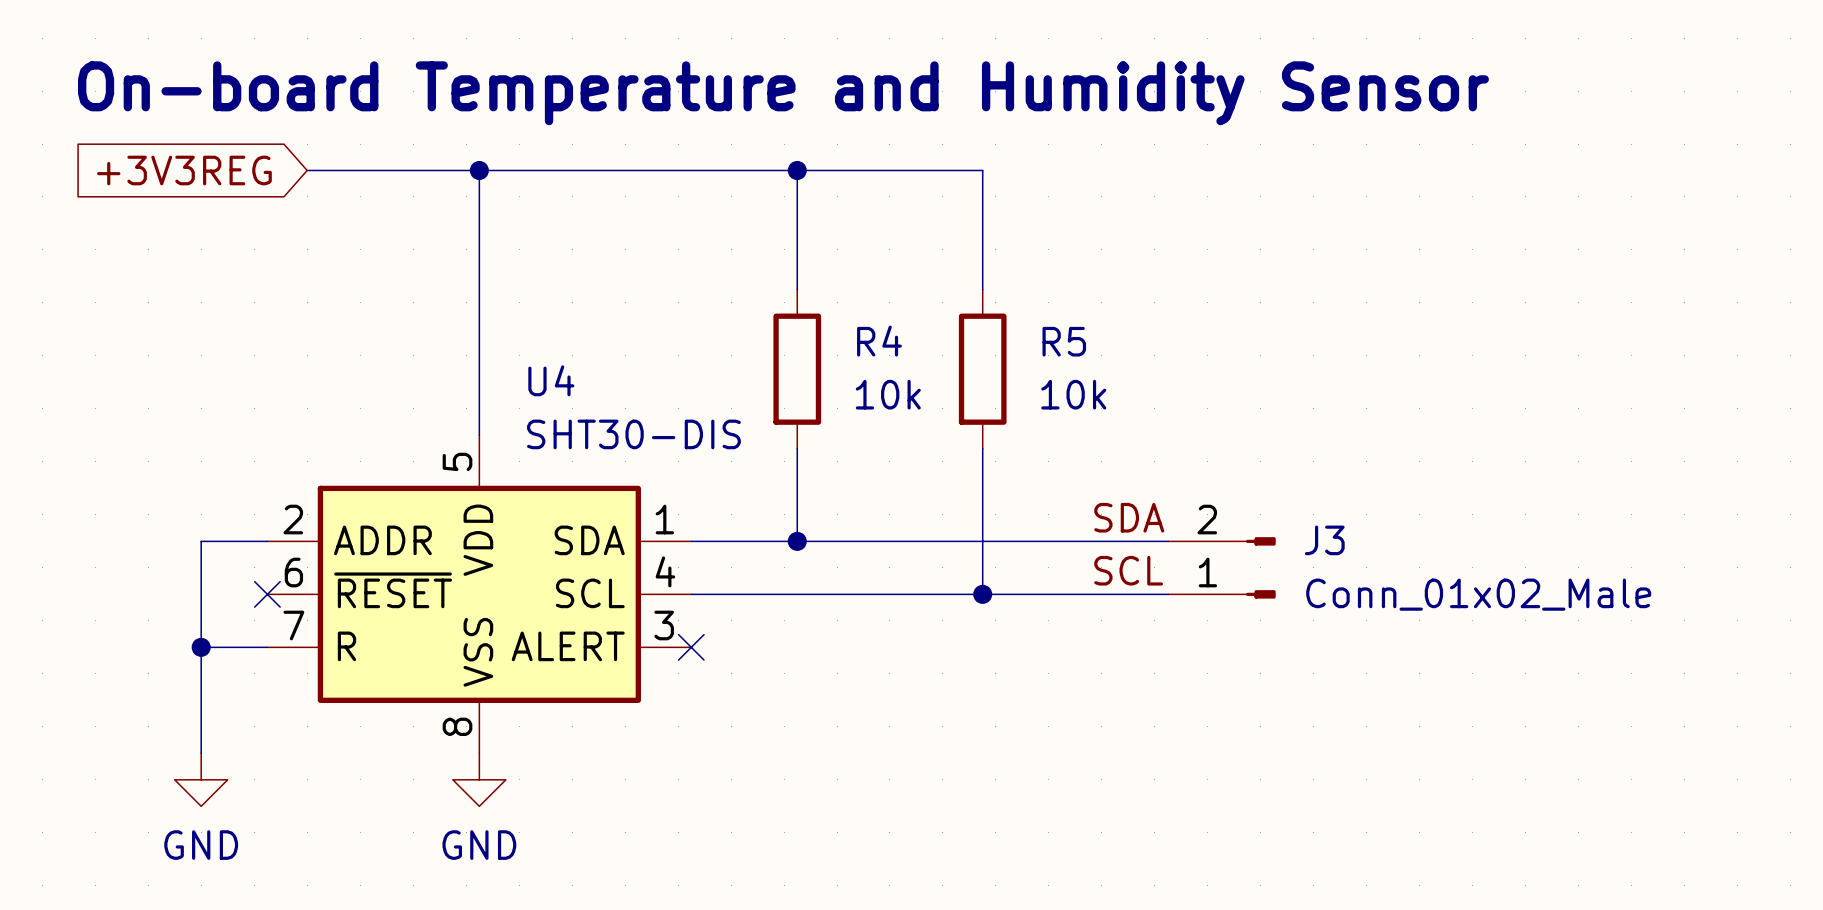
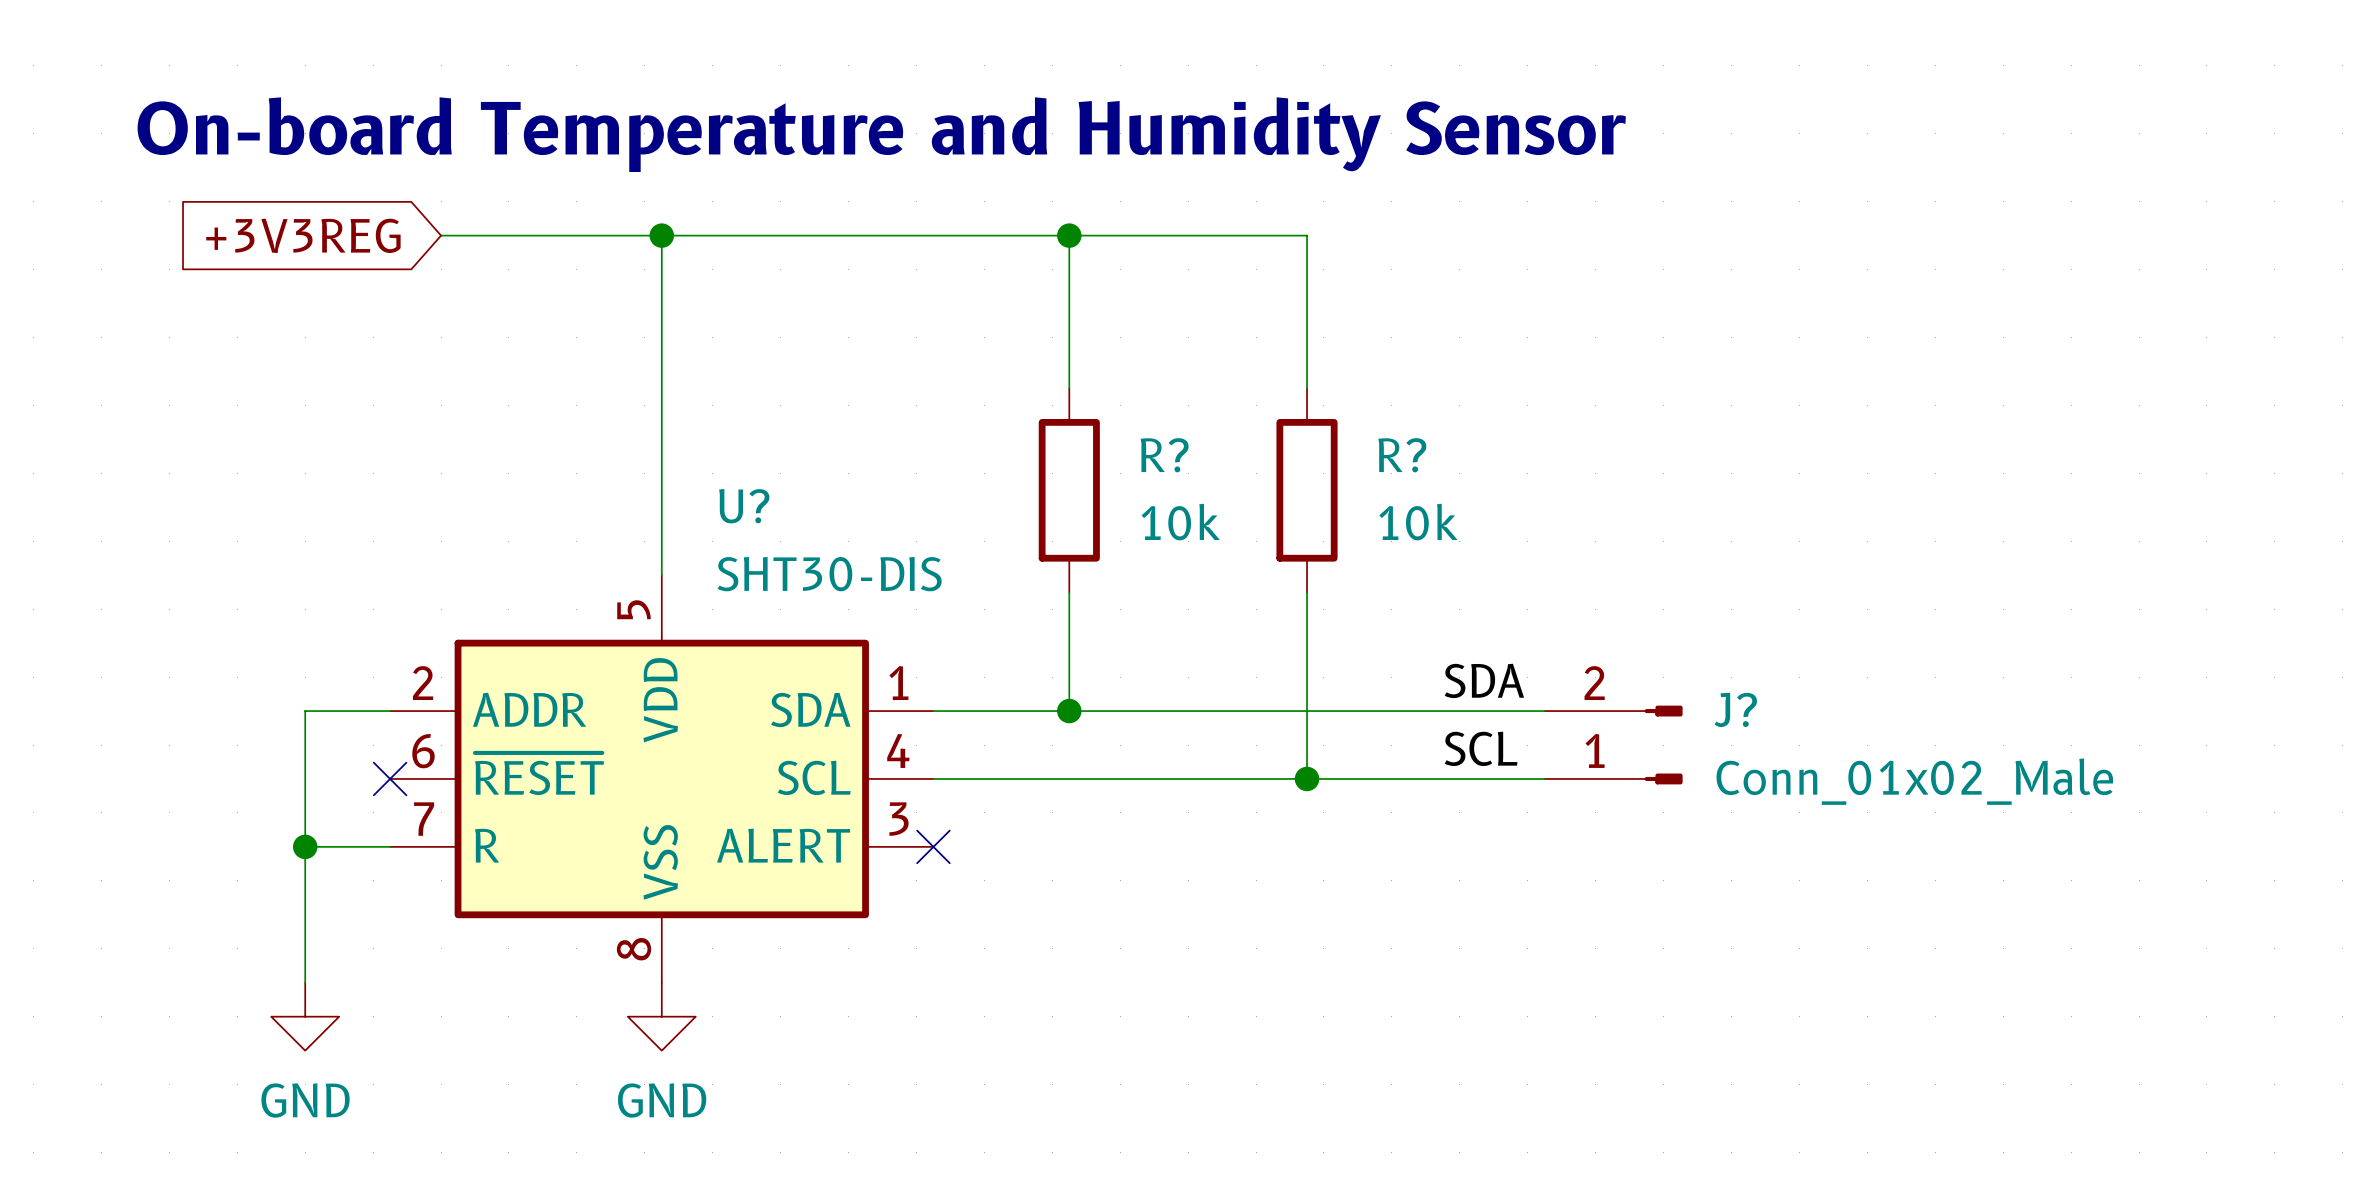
R4 name: R4 (879, 341) -> R? (1164, 455)
R5 name: R5 (1064, 341) -> R? (1402, 455)
U4 name: U4 (551, 380) -> U? (744, 506)
J3 name: J3 (1324, 540) -> J? (1735, 709)

